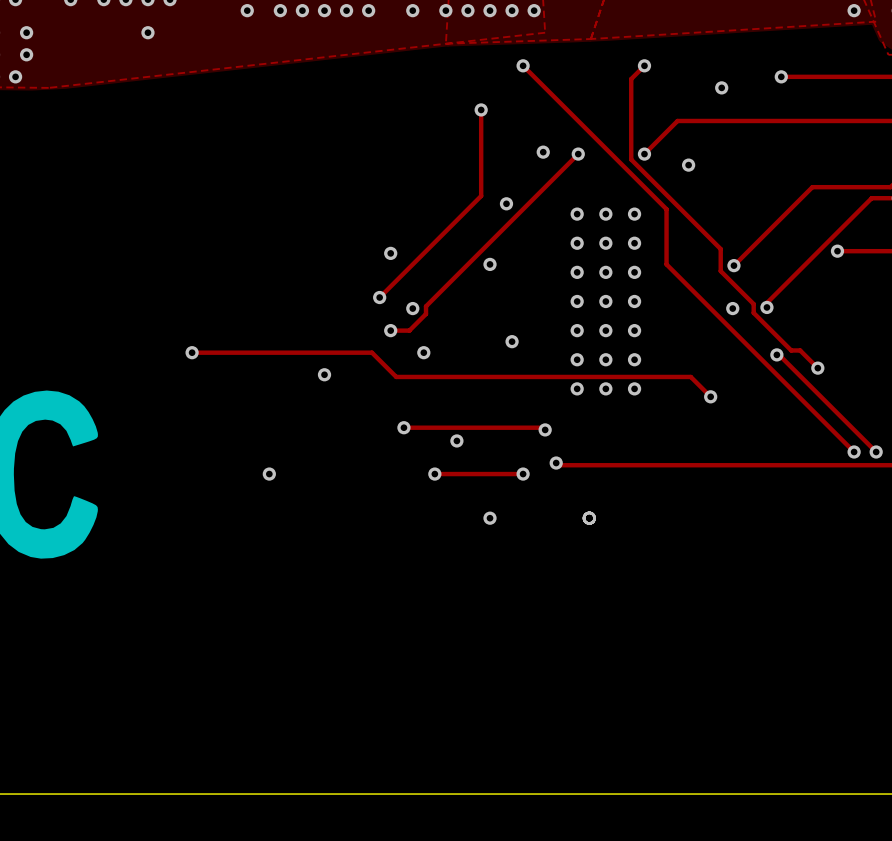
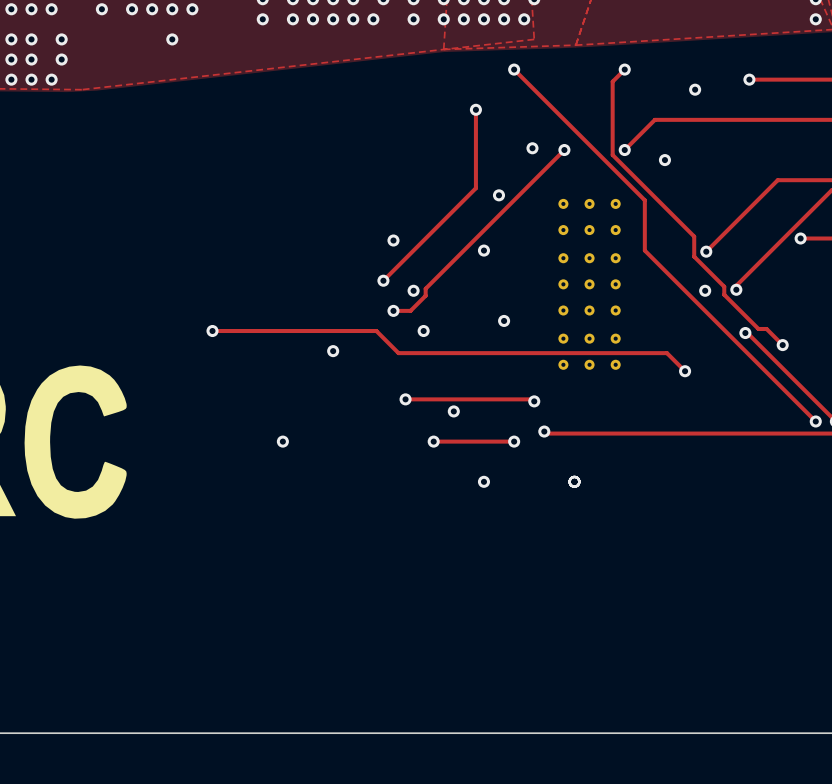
via: (577, 214) -> none
via: (605, 214) -> none
via: (634, 214) -> none
via: (577, 243) -> none
via: (605, 243) -> none
via: (634, 243) -> none
via: (577, 272) -> none
via: (605, 272) -> none
via: (634, 272) -> none
via: (577, 301) -> none
via: (605, 301) -> none
part: none -> (589, 284)
via: (634, 301) -> none
via: (577, 330) -> none
via: (605, 330) -> none
via: (634, 330) -> none
via: (577, 359) -> none
via: (605, 359) -> none
via: (634, 359) -> none
via: (577, 388) -> none
via: (605, 388) -> none
via: (634, 388) -> none

